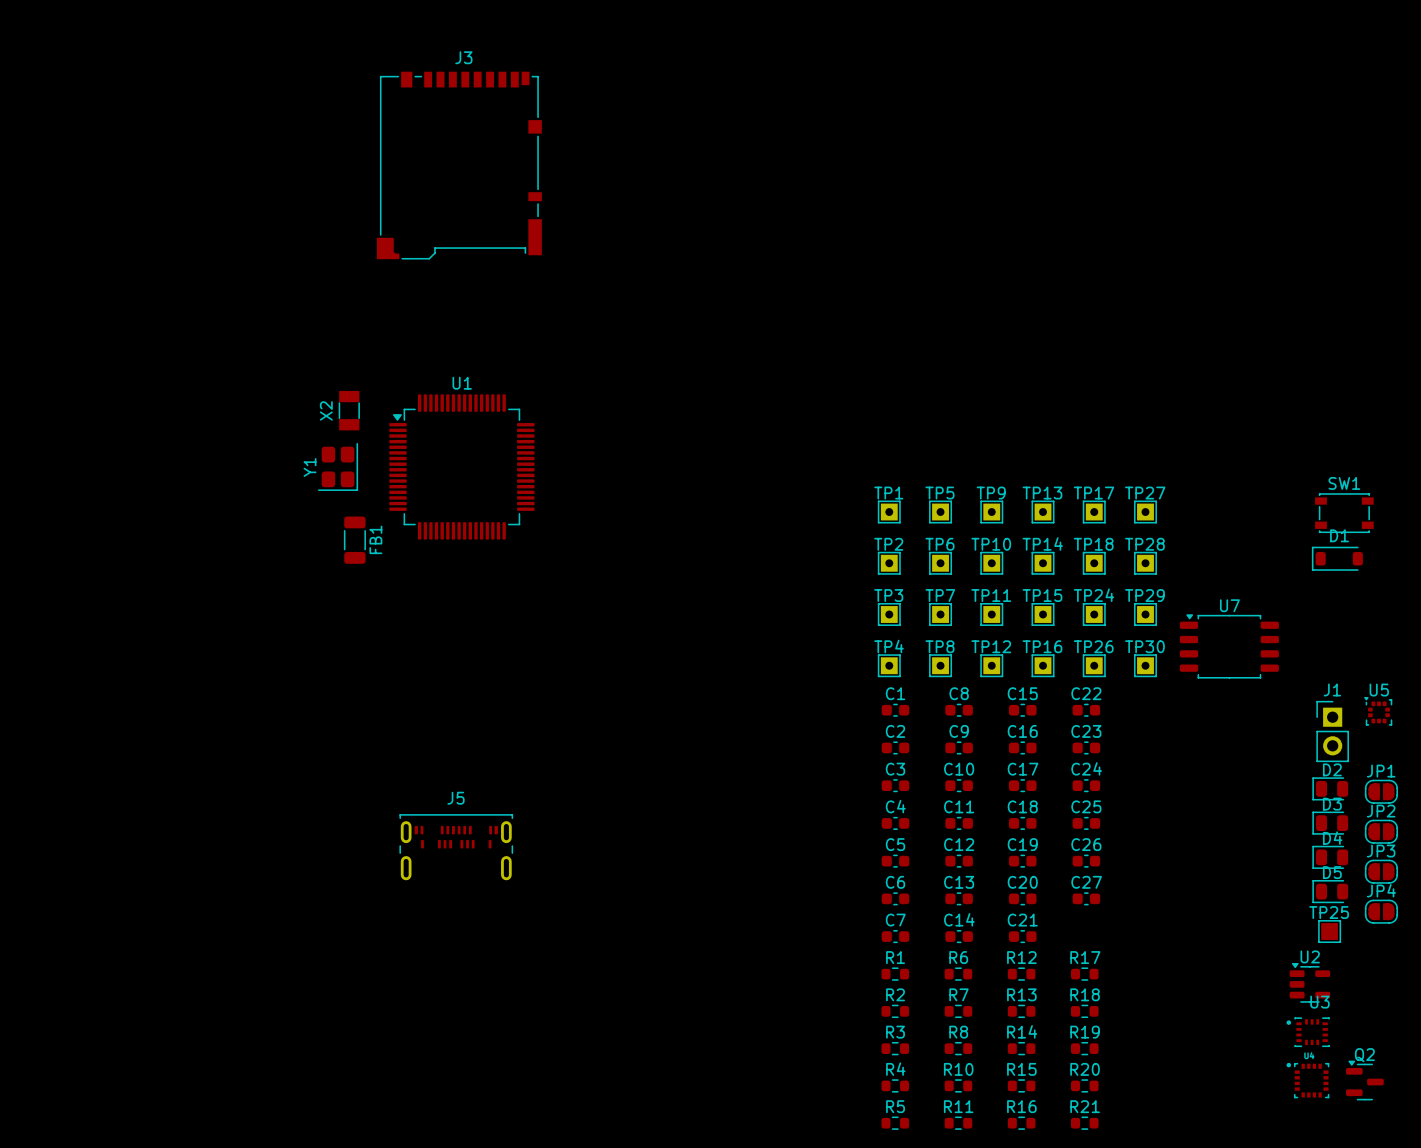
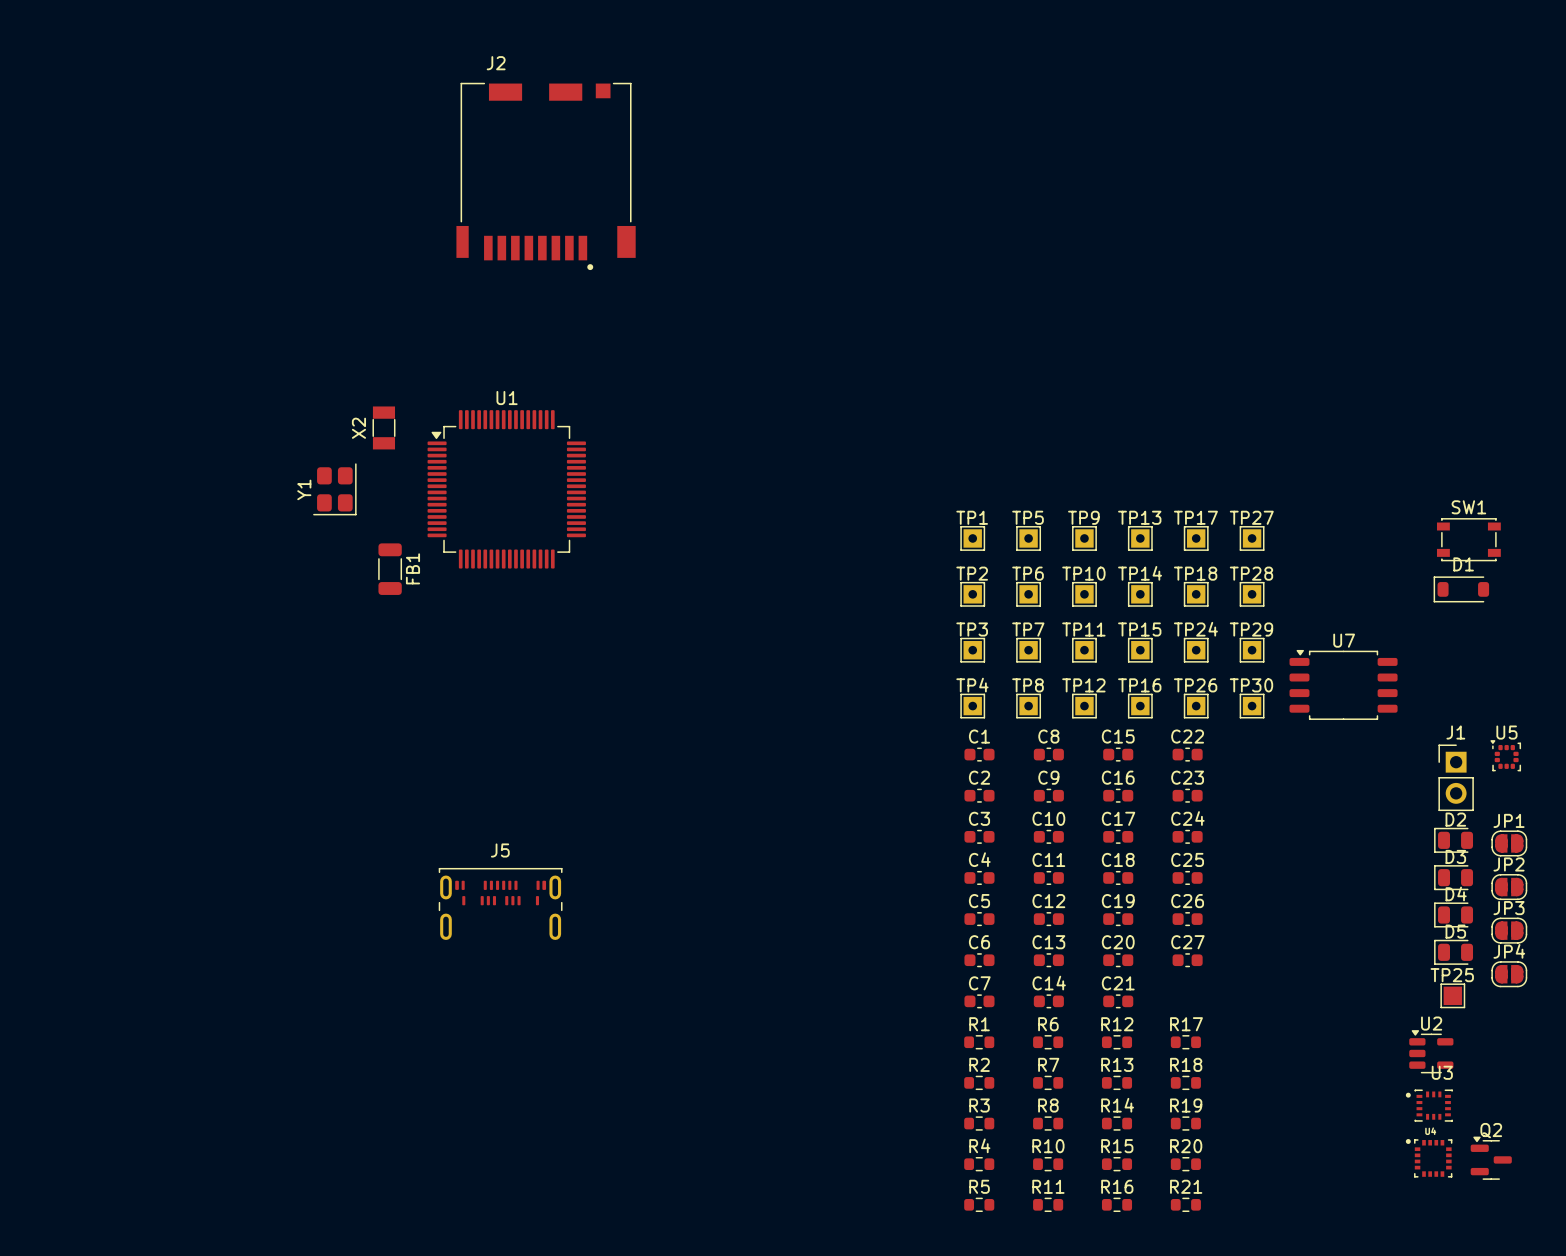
J3: (459, 165) -> none
J2: none -> (546, 176)
Y1 position: (338, 466) -> (334, 489)

